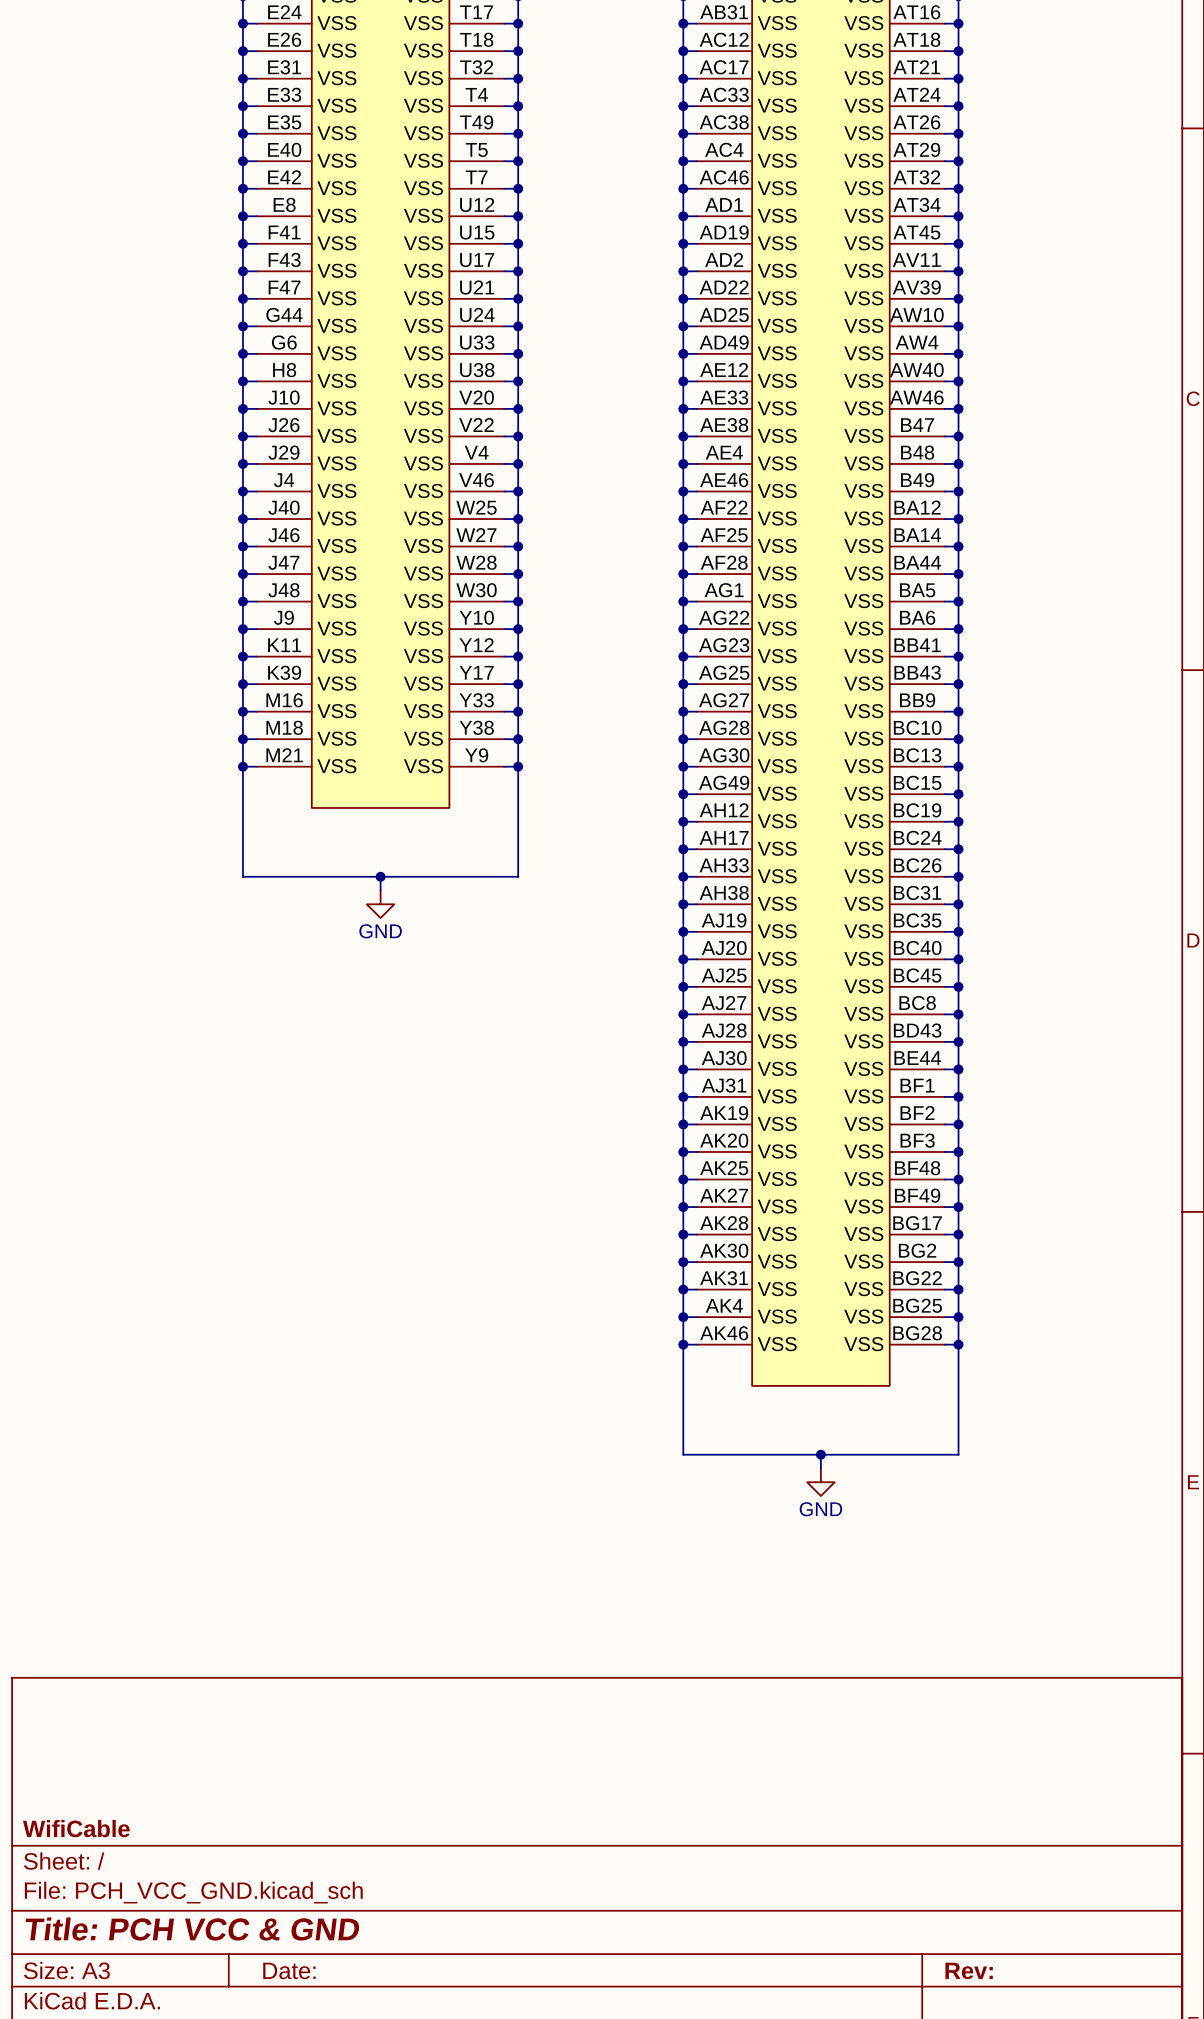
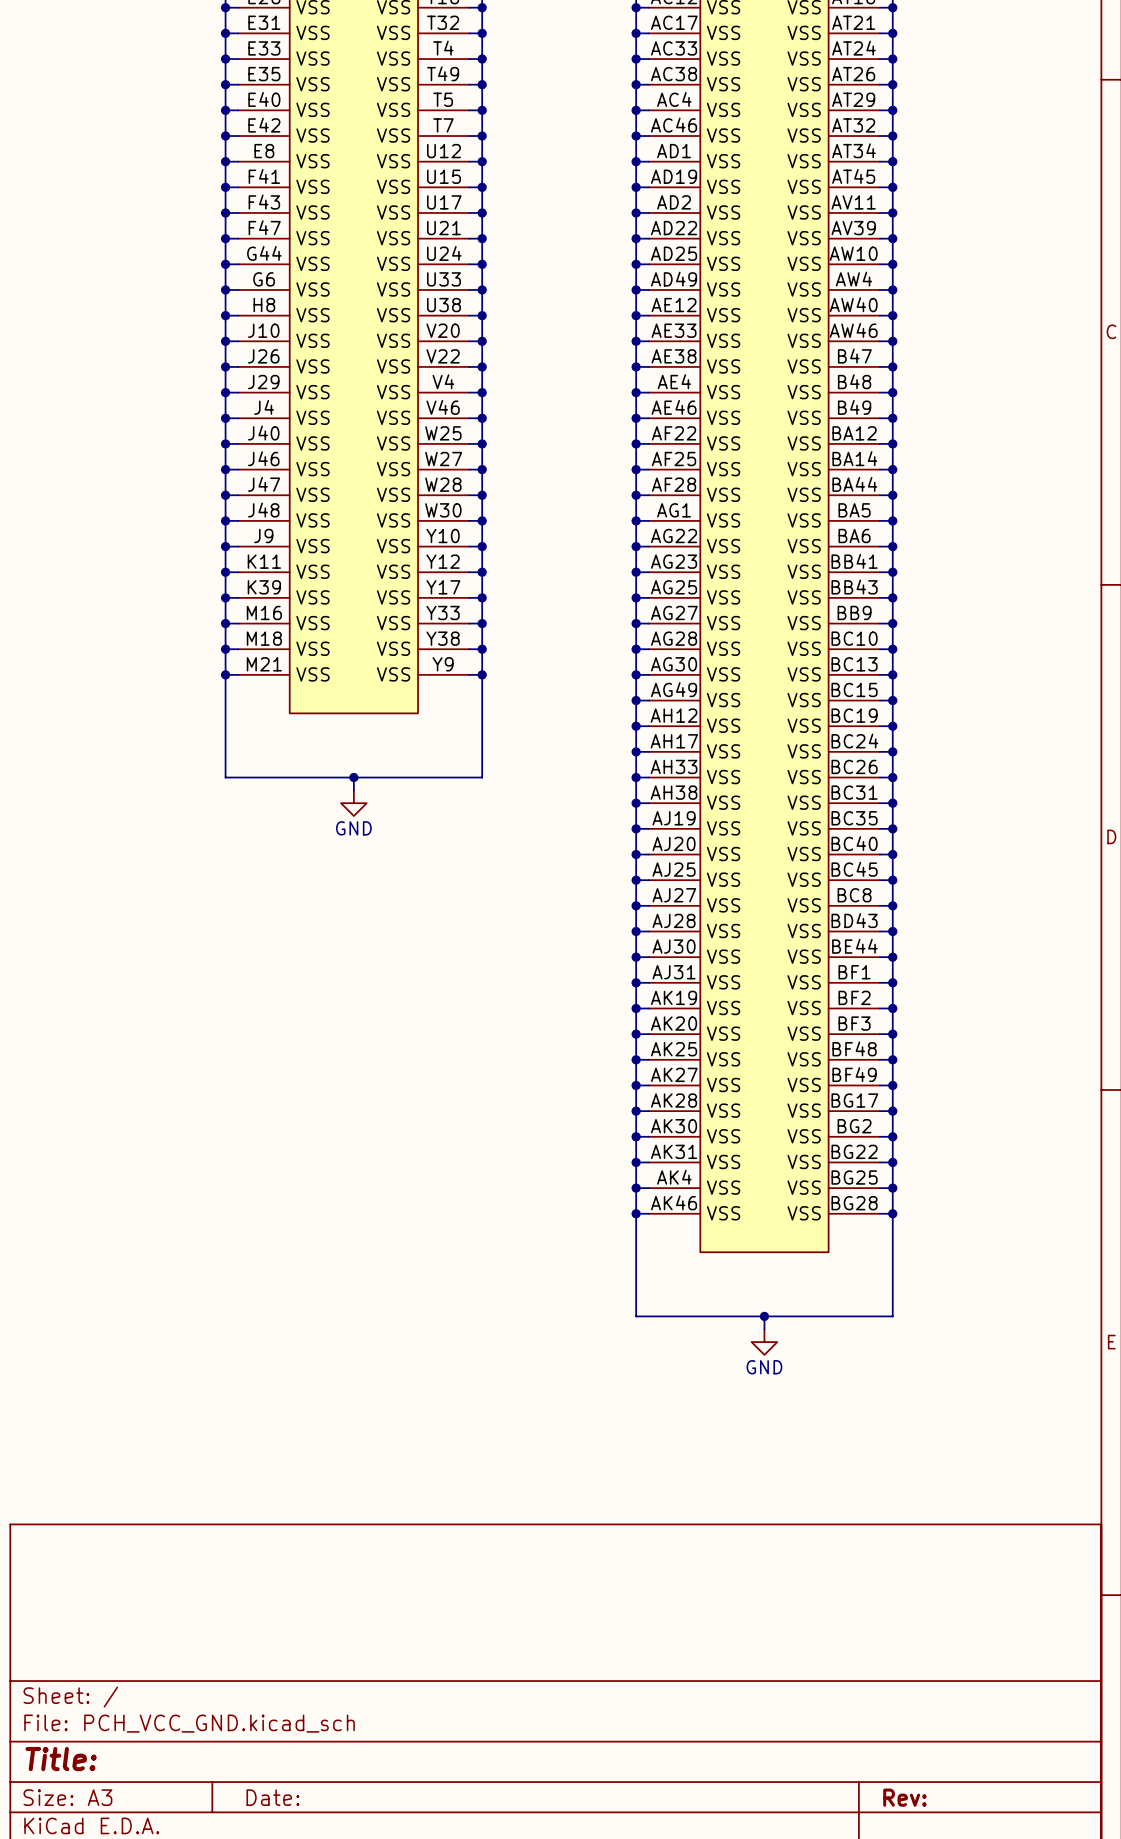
title block: WifiCable (76, 1828) -> none
title block: Title: PCH VCC & GND (192, 1929) -> Title: (61, 1759)

